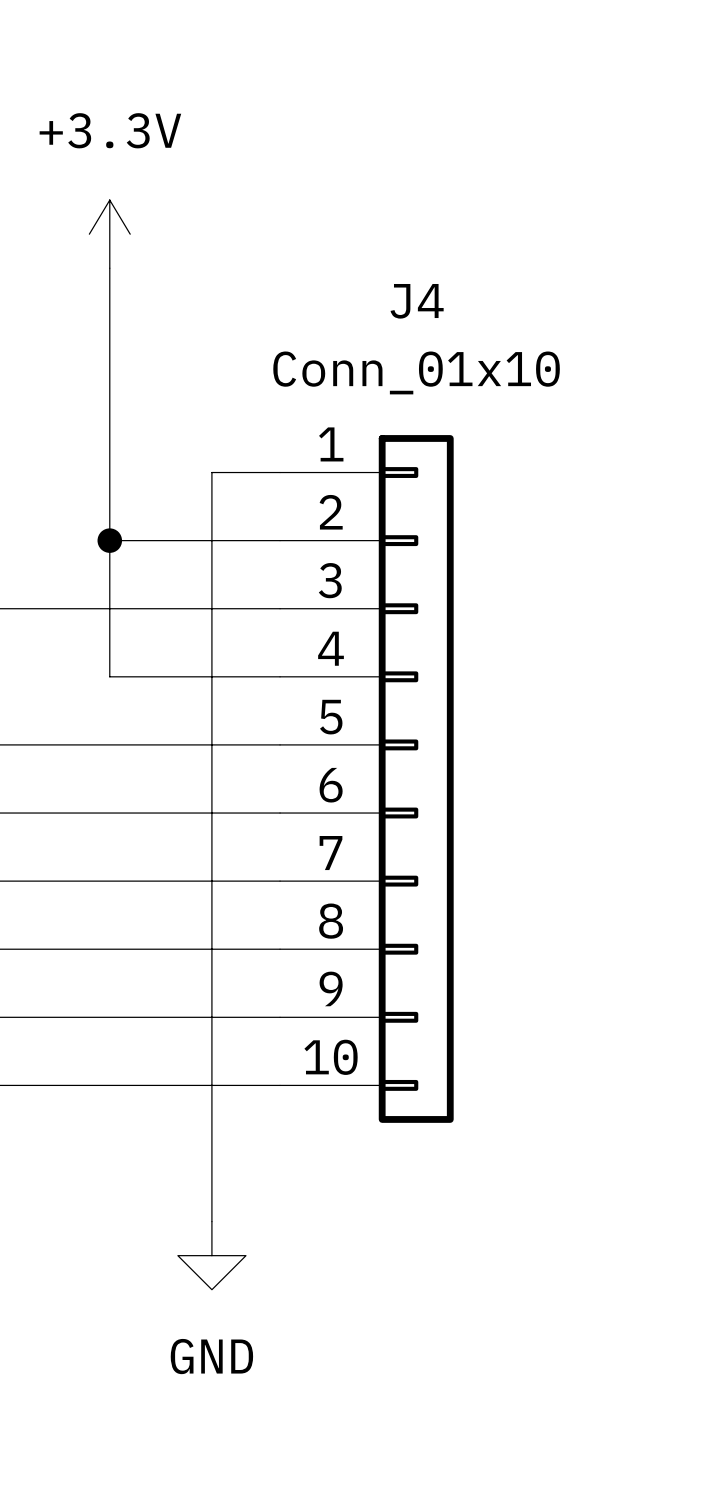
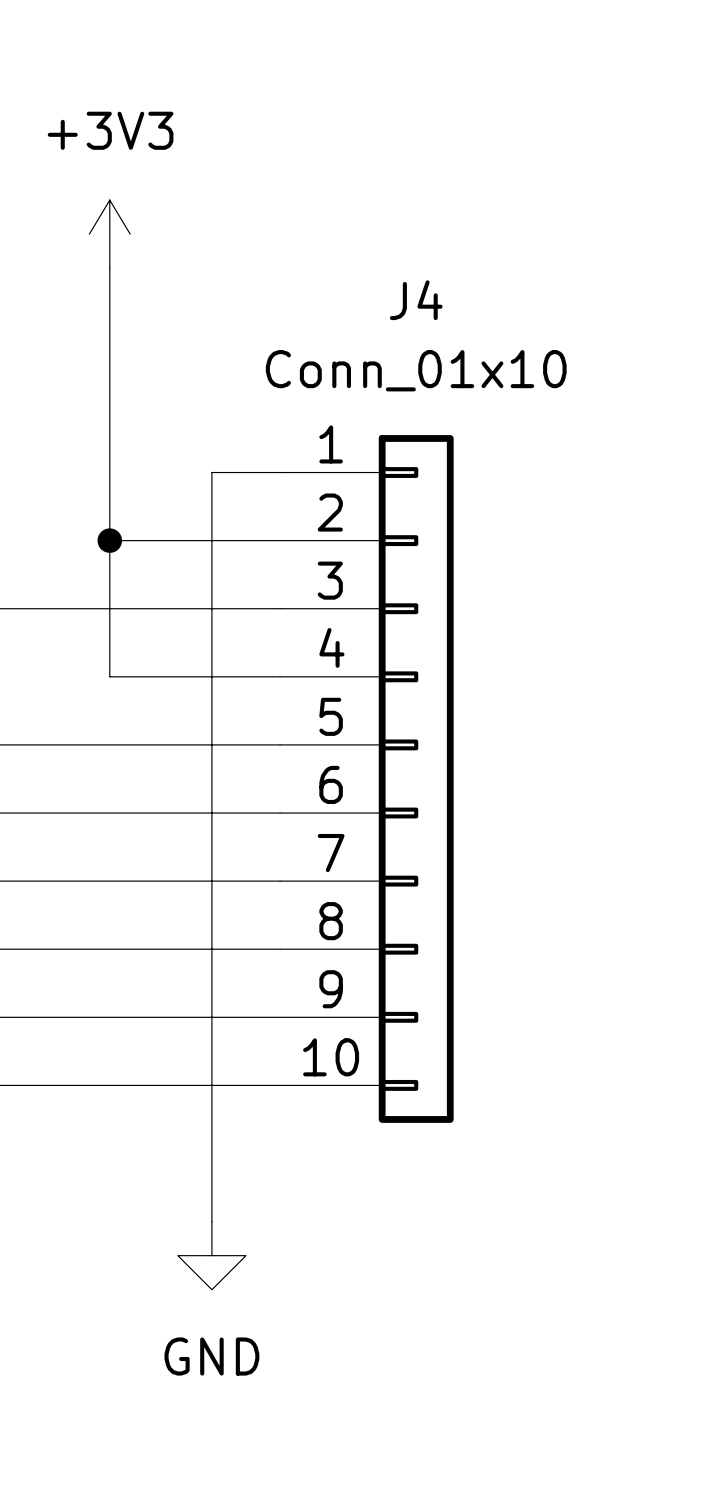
power symbol: +3.3V (109, 234) -> +3V3 (109, 234)

